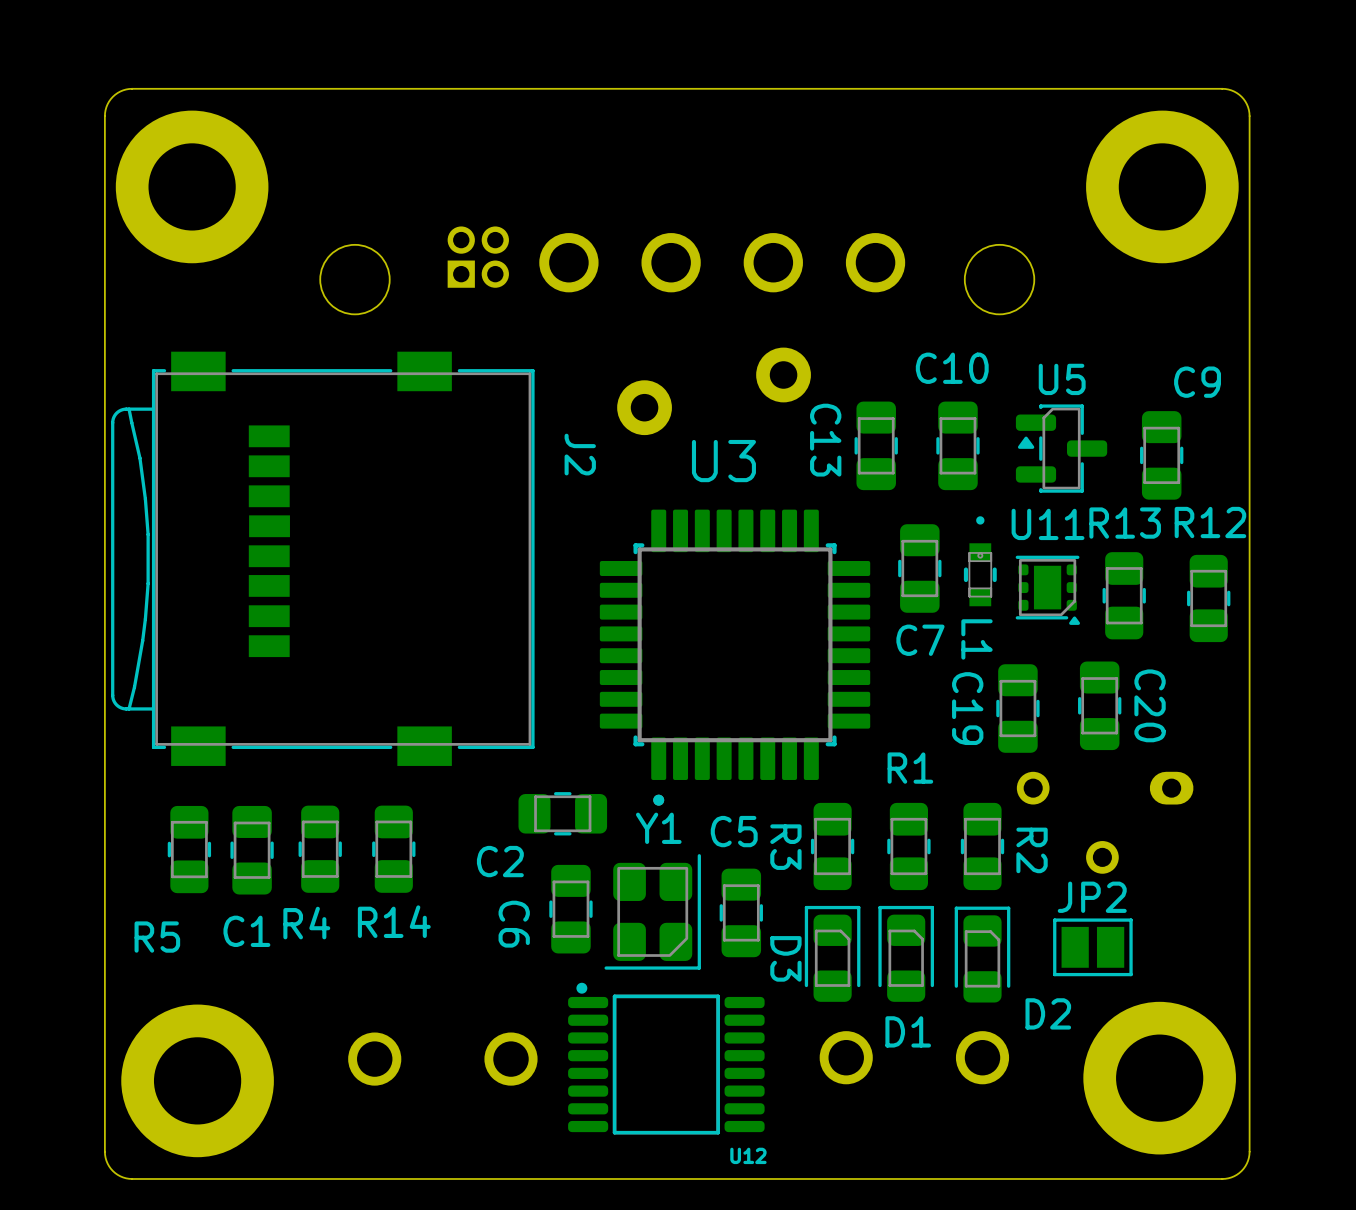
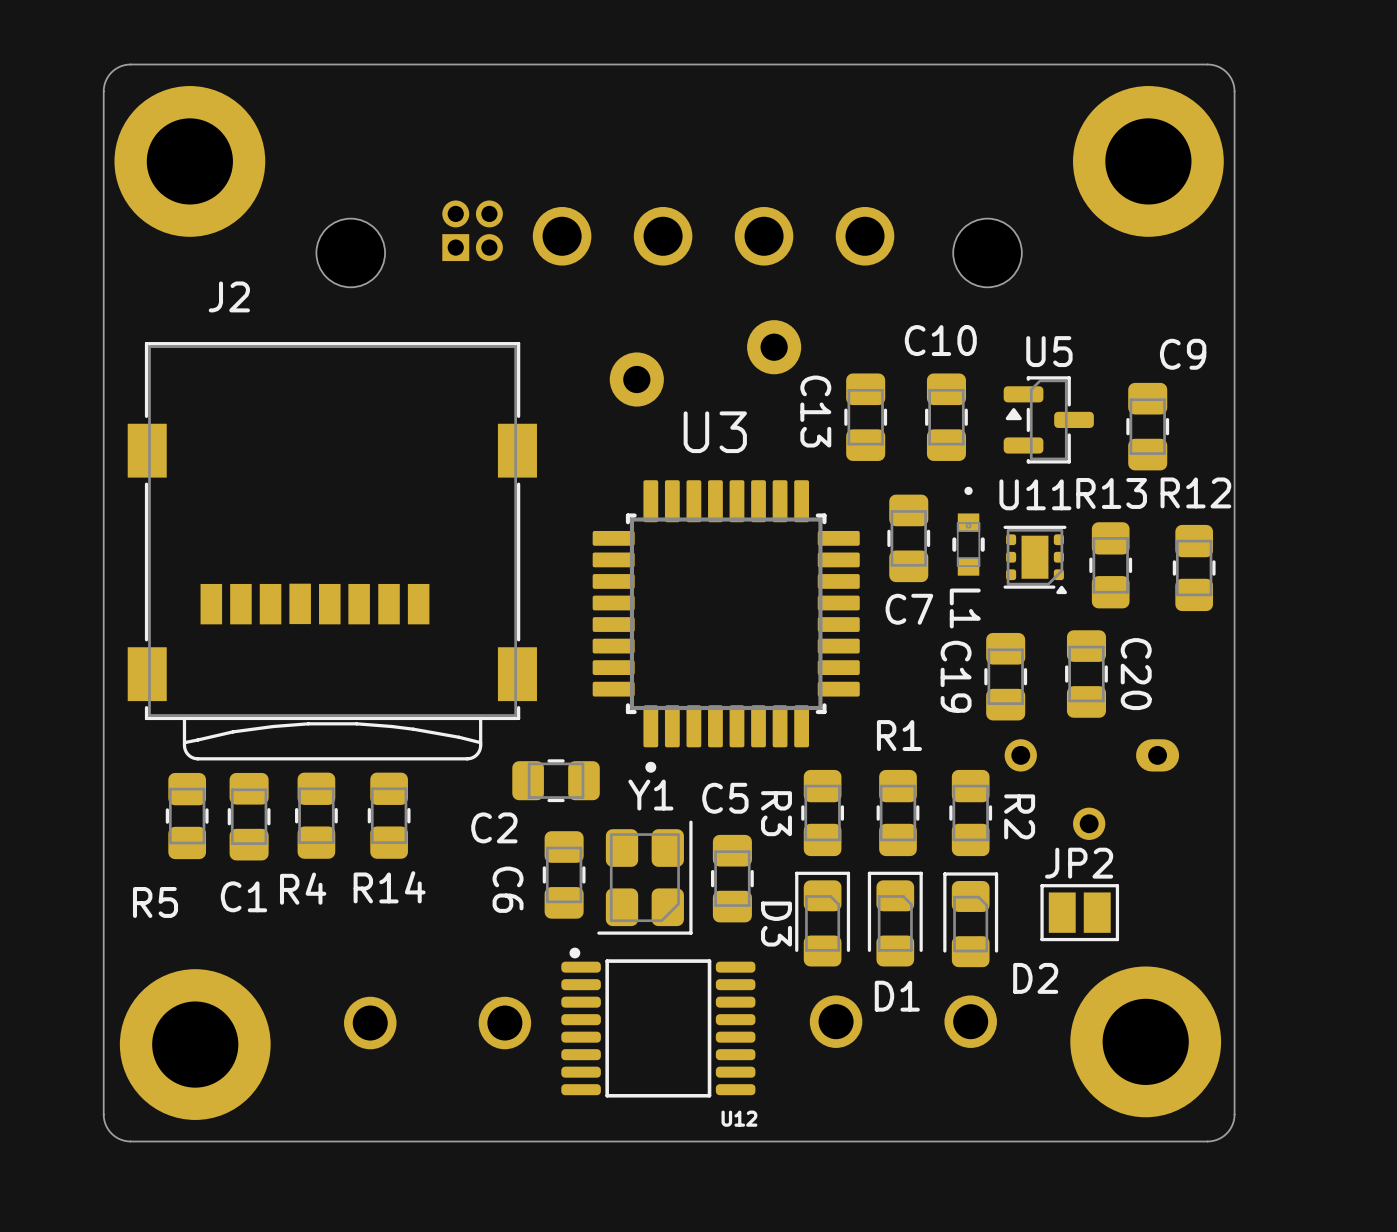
J2 rotation: 0° (322, 558) -> 90° counterclockwise (332, 551)

